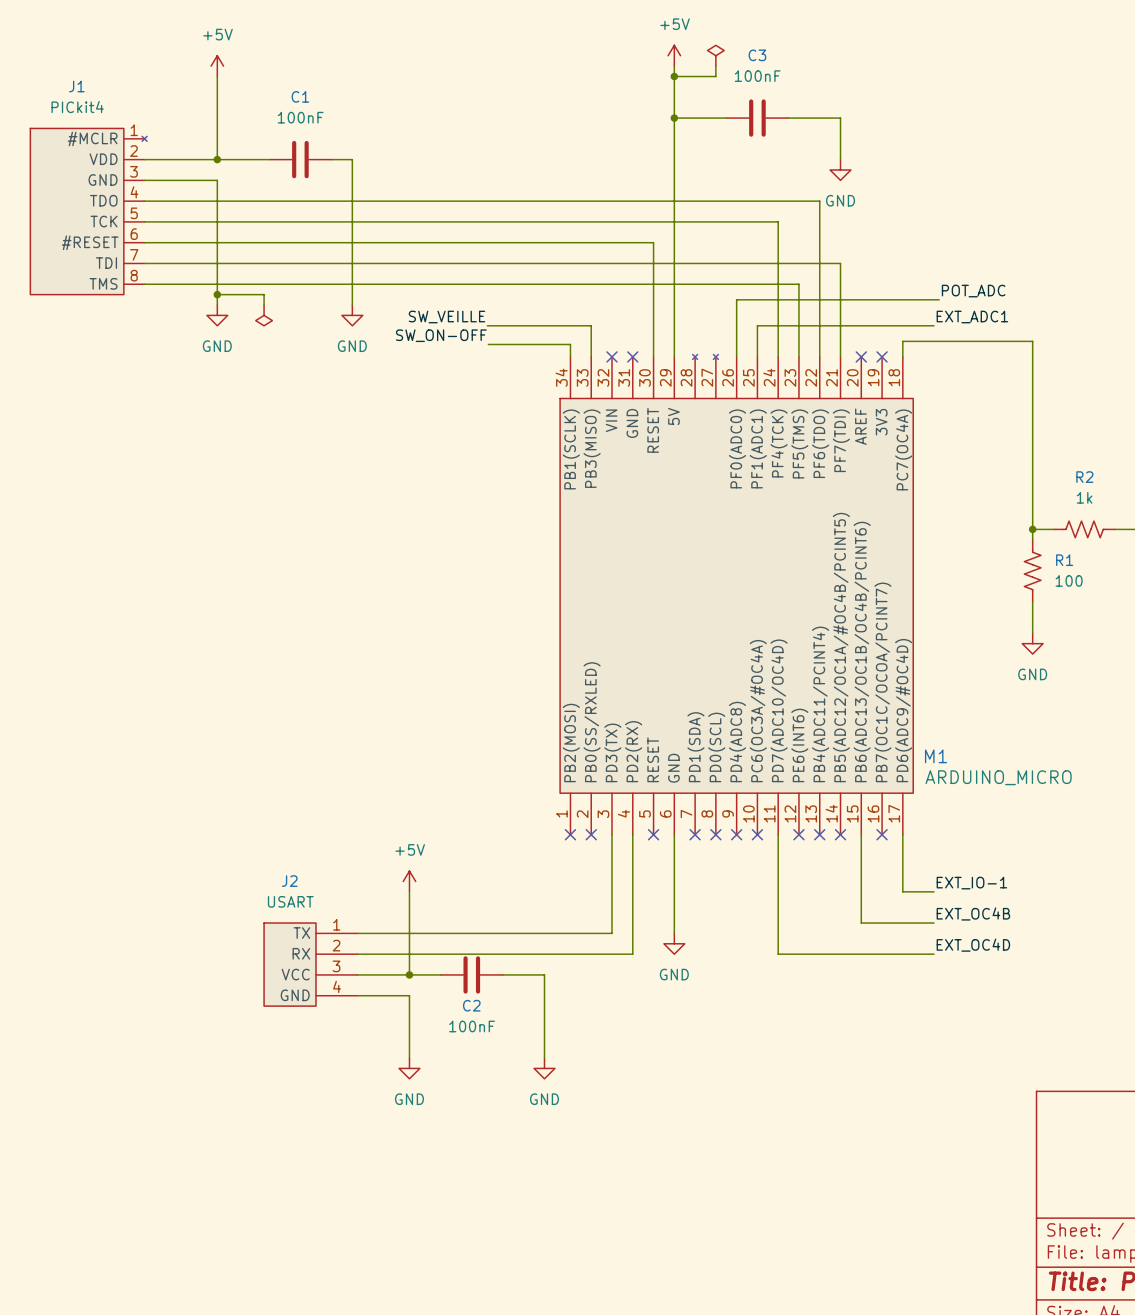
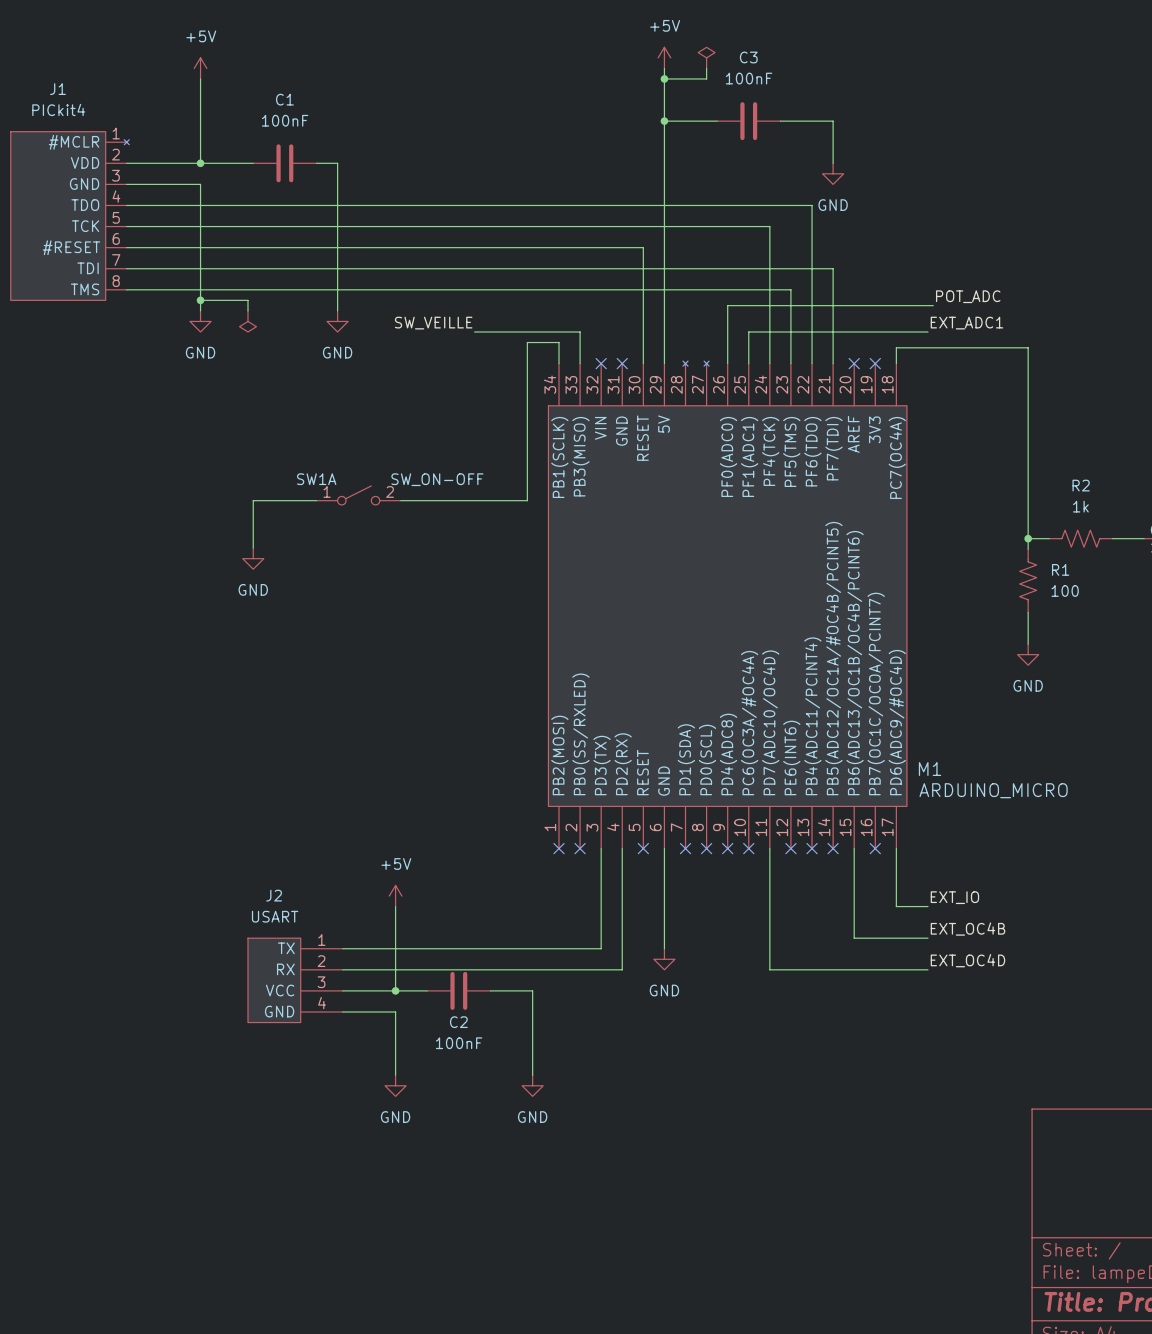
label: SW_ON-OFF (441, 335) -> none
wire: (488, 344) (570, 344) -> (400, 500) (527, 500) (527, 342) (559, 342) (559, 350)
SW1A: none -> SW_ON-OFF (358, 495)
wire: none -> (316, 500) (253, 500) (253, 548)
power symbol: none -> GND (253, 558)
label: EXT_IO-1 (971, 883) -> EXT_IO (954, 897)

